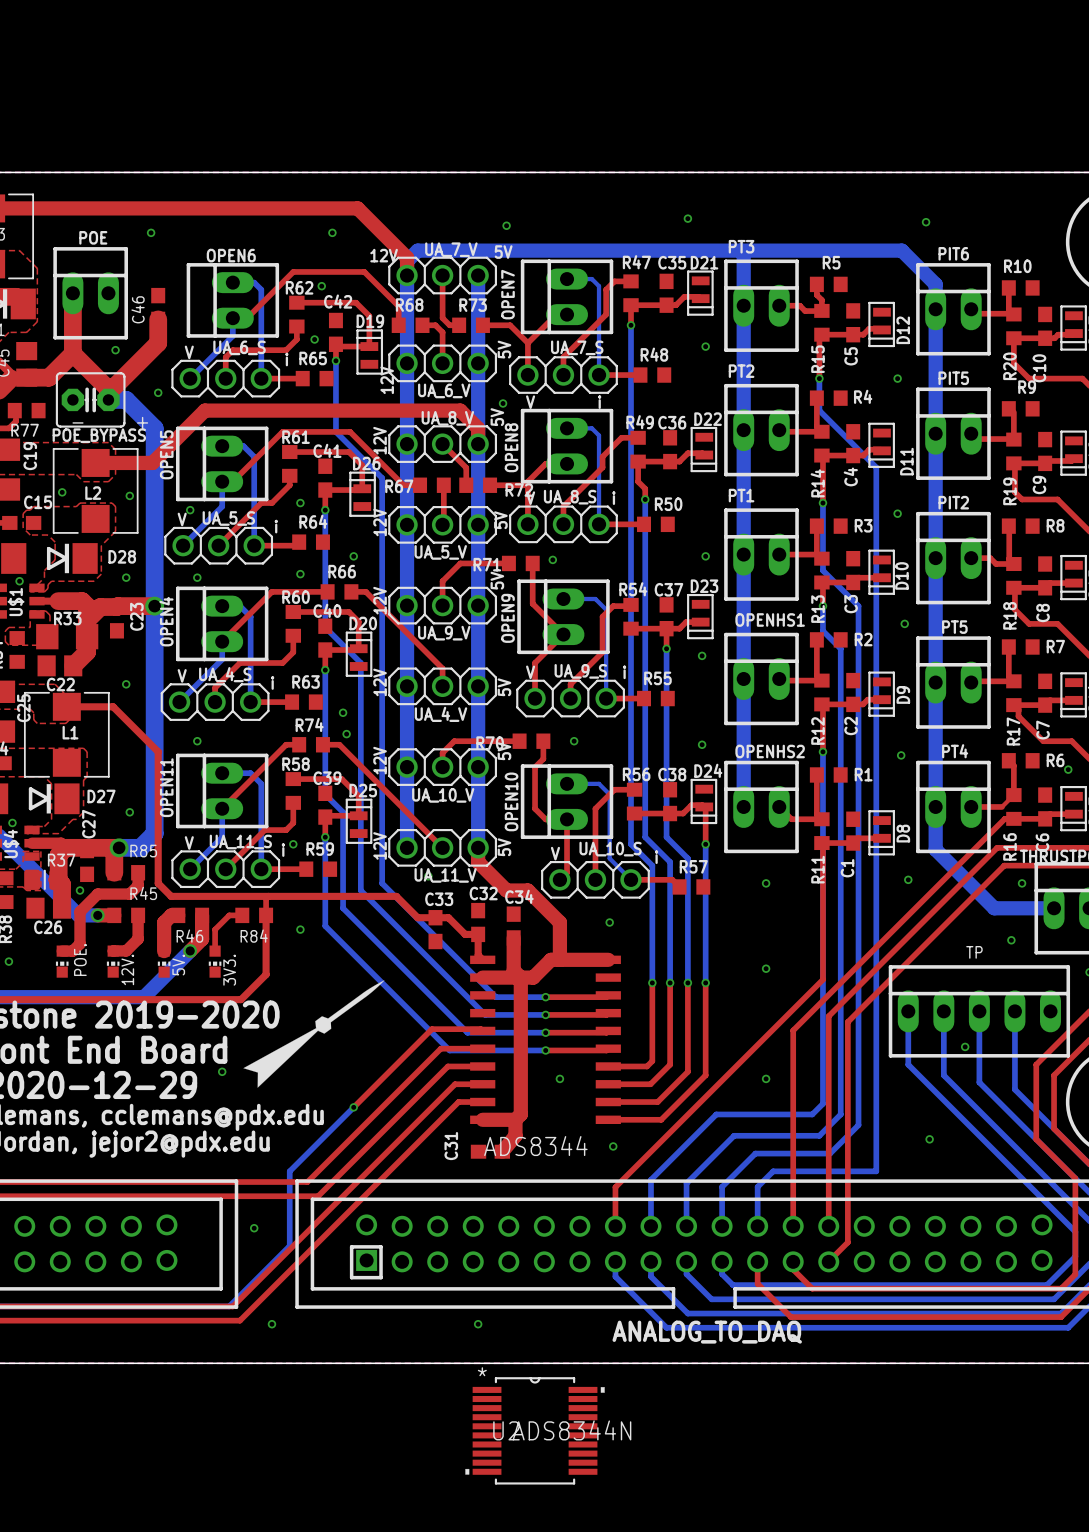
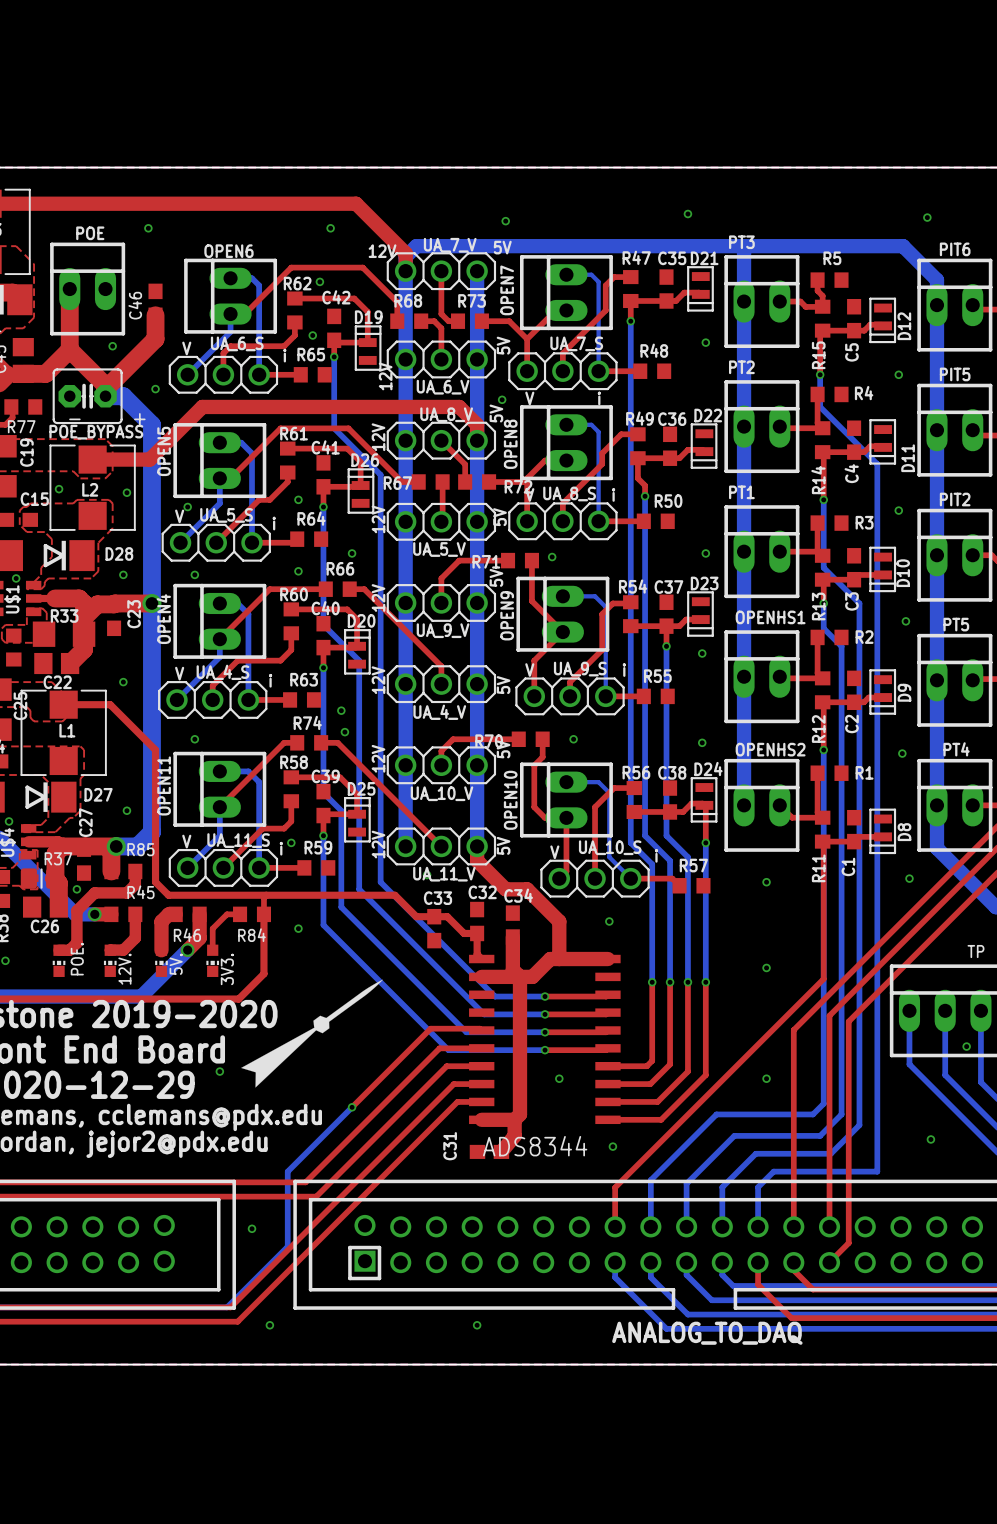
U2: ADS8344N (535, 1430) -> none

